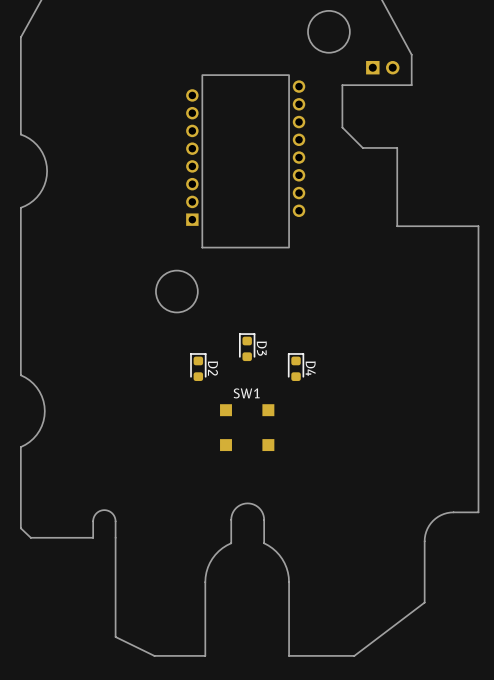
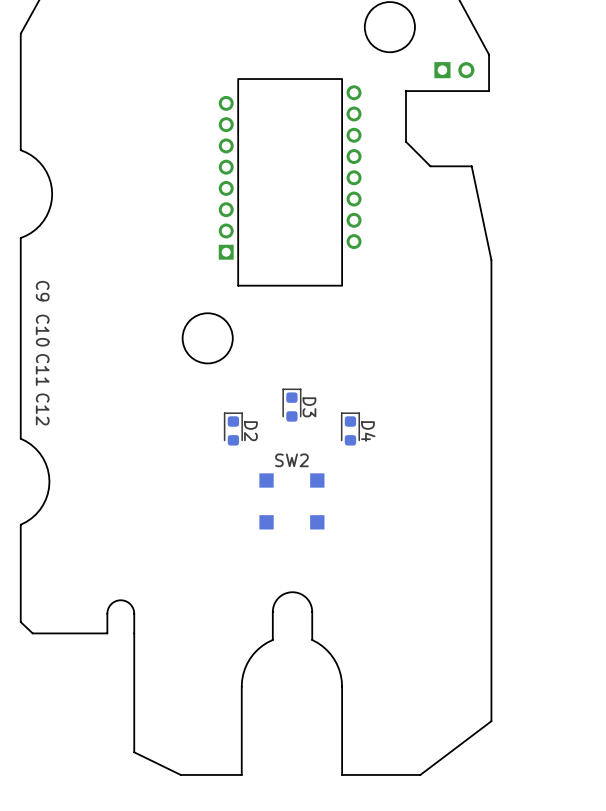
board edge: (397, 147) (397, 226) (478, 226) (478, 512) (447, 513) (438, 516) (430, 523) (424, 538) (424, 602) (354, 655) -> (471, 166) (491, 260) (491, 721) (420, 774)
C9: none -> (42, 291)
C10: none -> (42, 330)
C11: none -> (42, 370)
C12: none -> (42, 409)
SW1 name: SW1 (246, 393) -> SW2 (291, 460)

